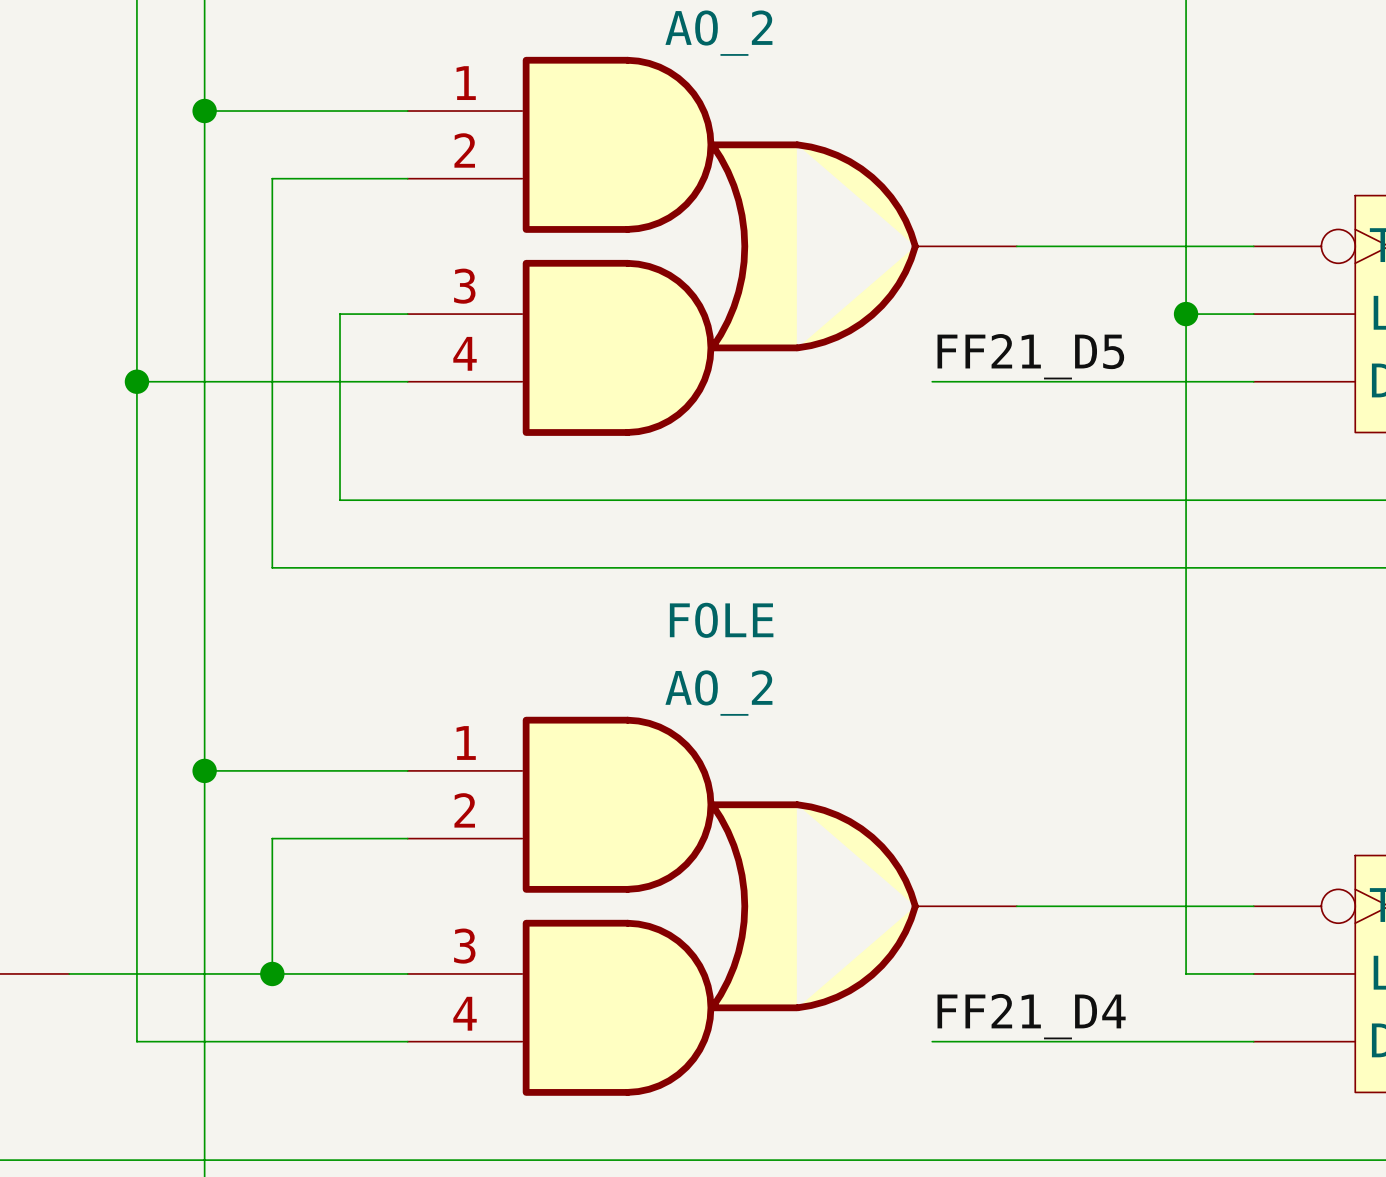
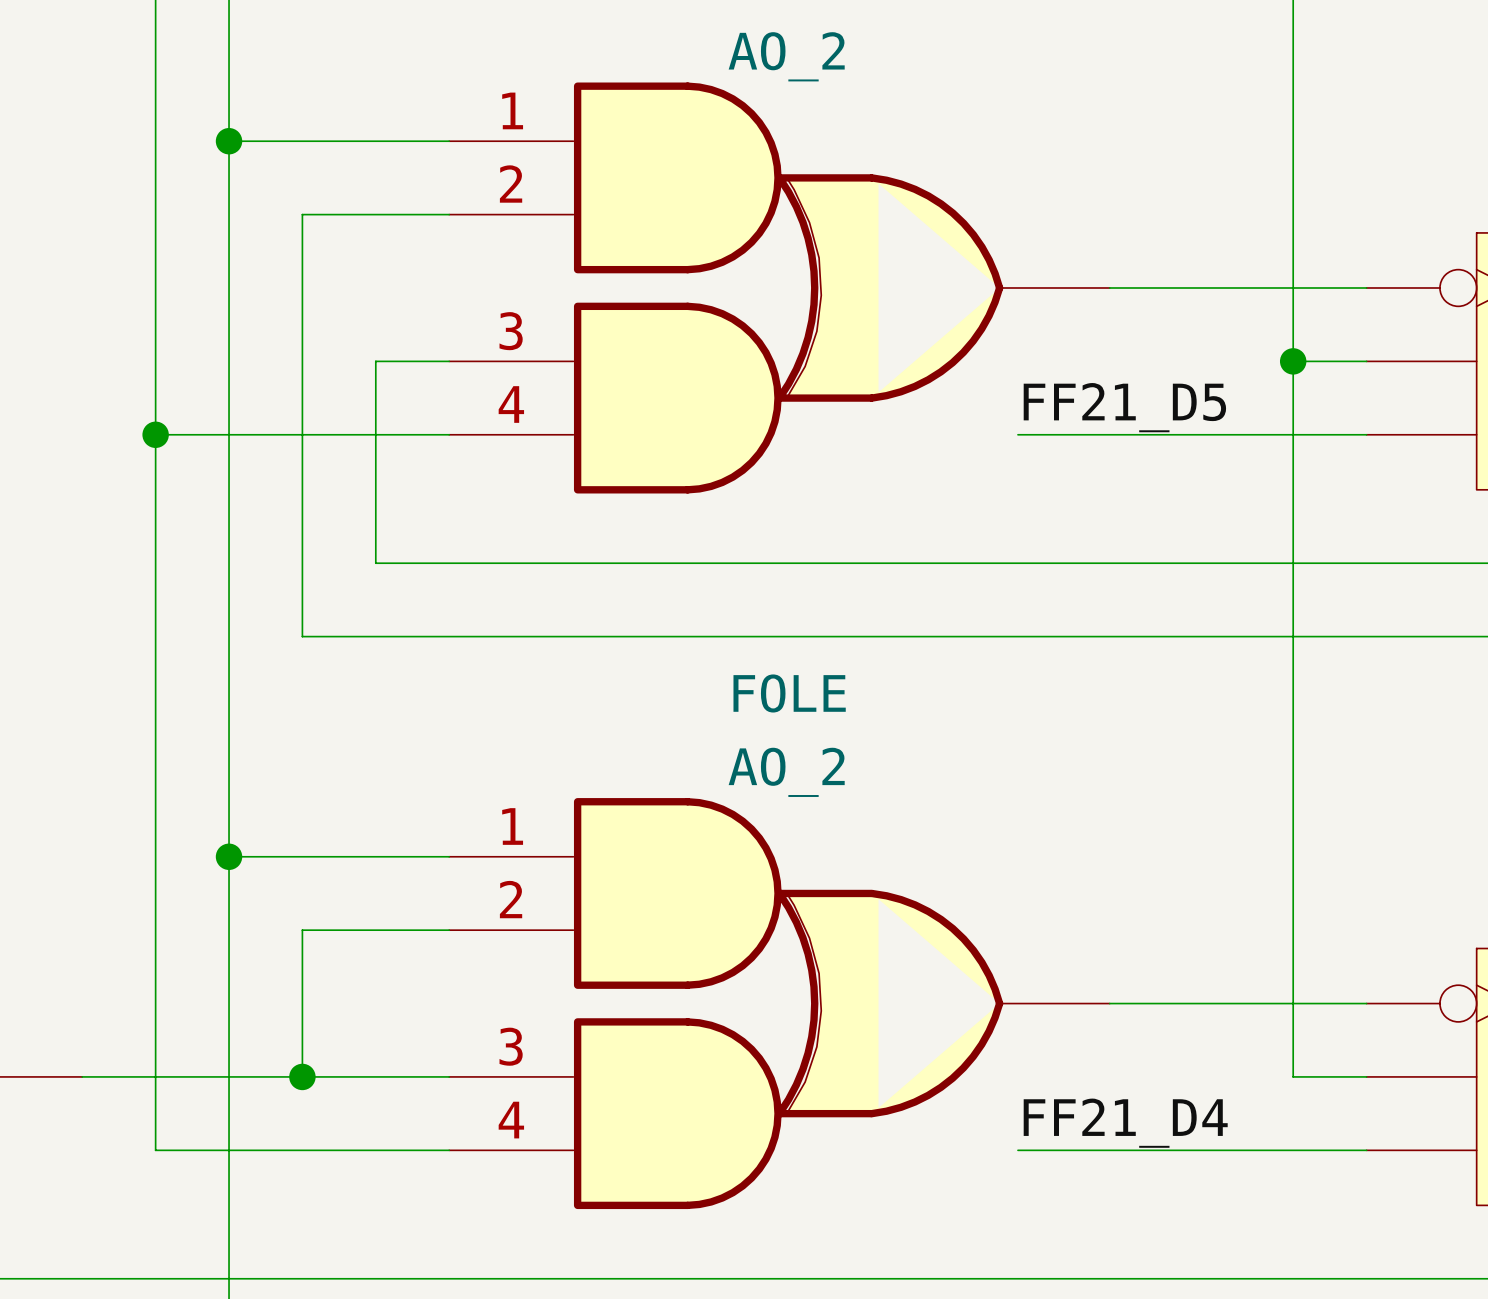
part symbol: [407, 56, 1017, 436] -> [449, 82, 1110, 494]
FOLE symbol: [407, 716, 1017, 1096] -> [449, 798, 1110, 1210]

